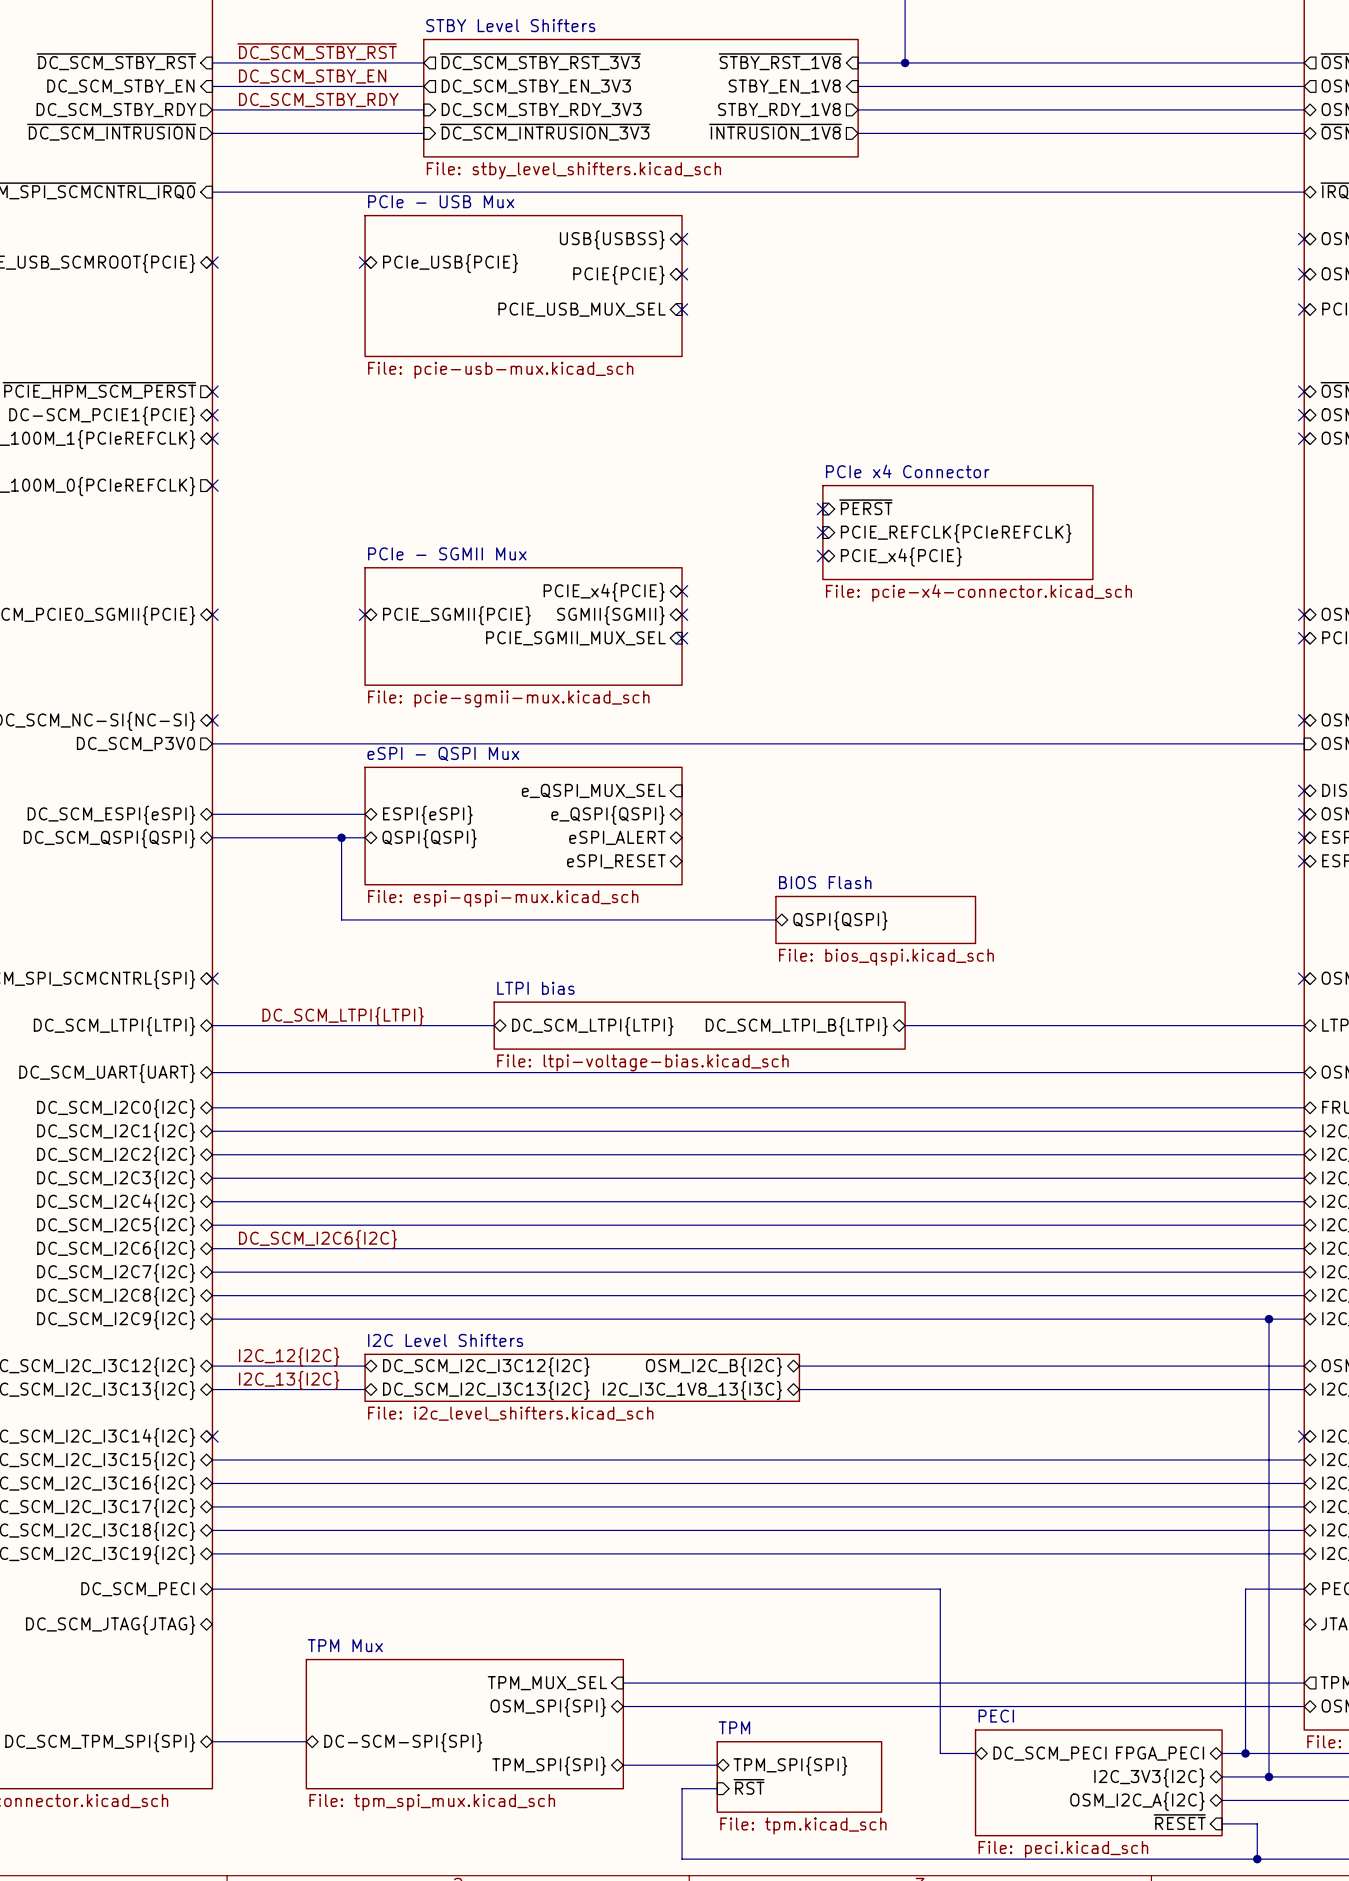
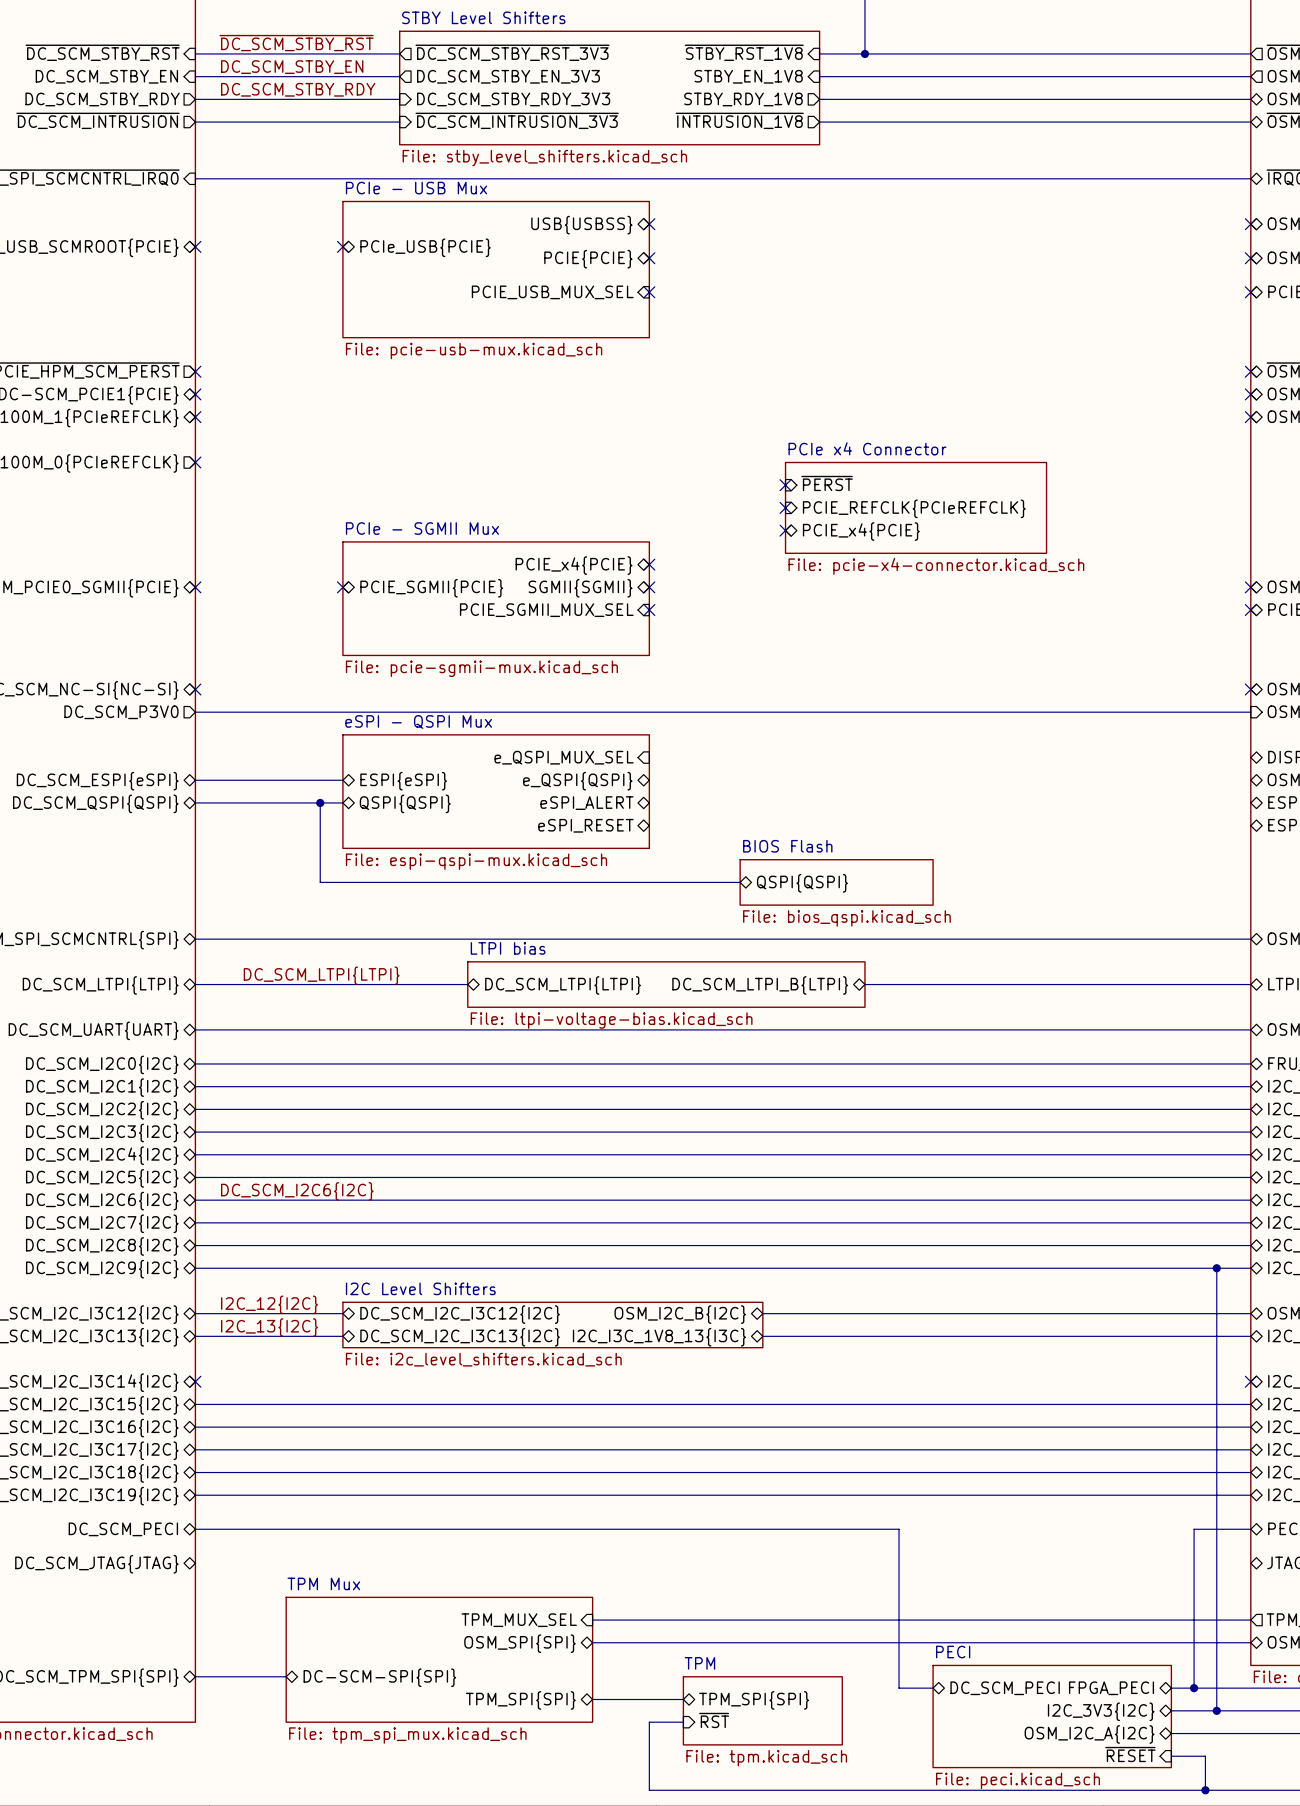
no-connect mark: (1304, 790) -> none
no-connect mark: (1304, 814) -> none
no-connect mark: (1304, 837) -> none
no-connect mark: (1304, 861) -> none
bus: none -> (195, 939) (1250, 939)
no-connect mark: (212, 978) -> none
no-connect mark: (1304, 978) -> none

